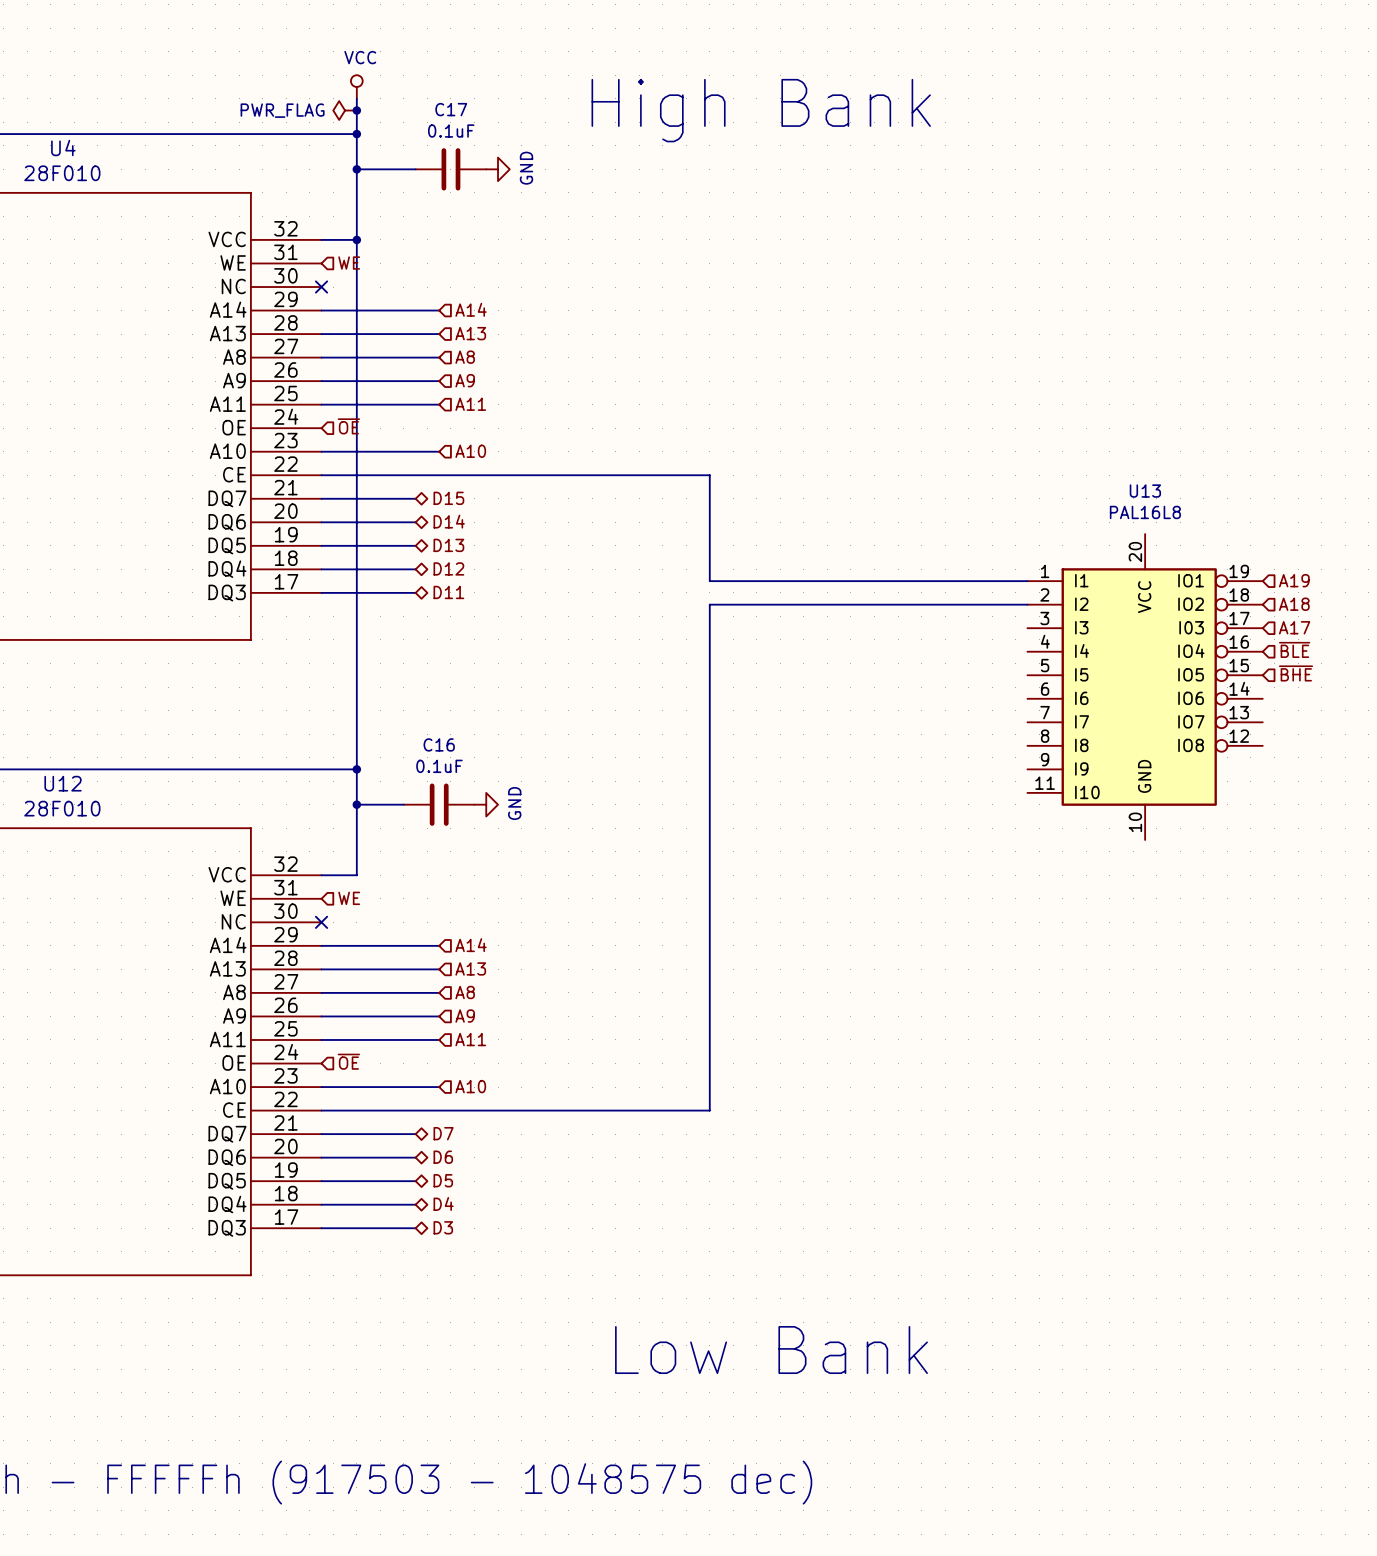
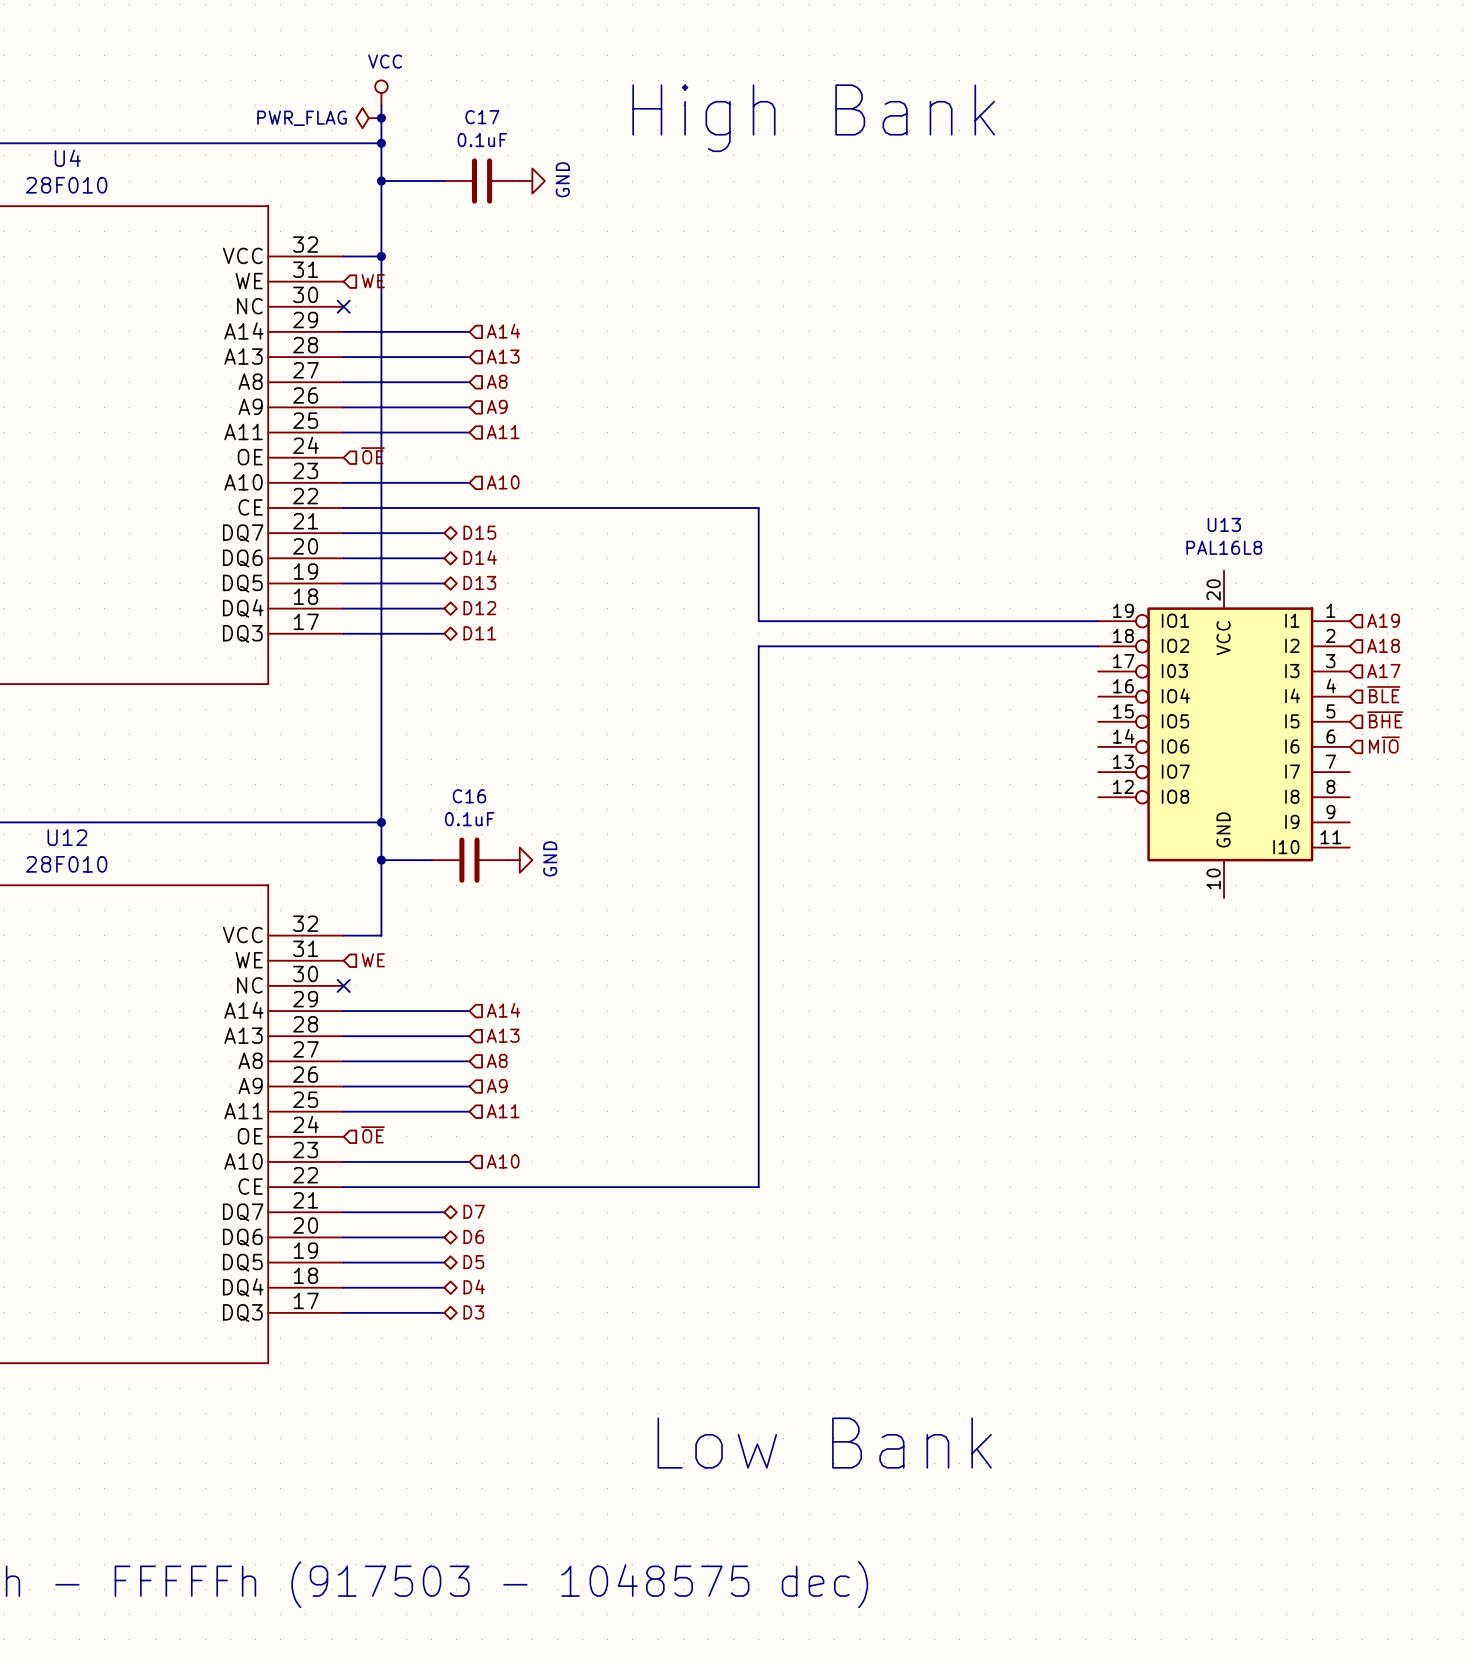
U13 flip: as is (1139, 687) -> left-right (1230, 734)
hierarchical label: none -> M~{IO} (1384, 745)

